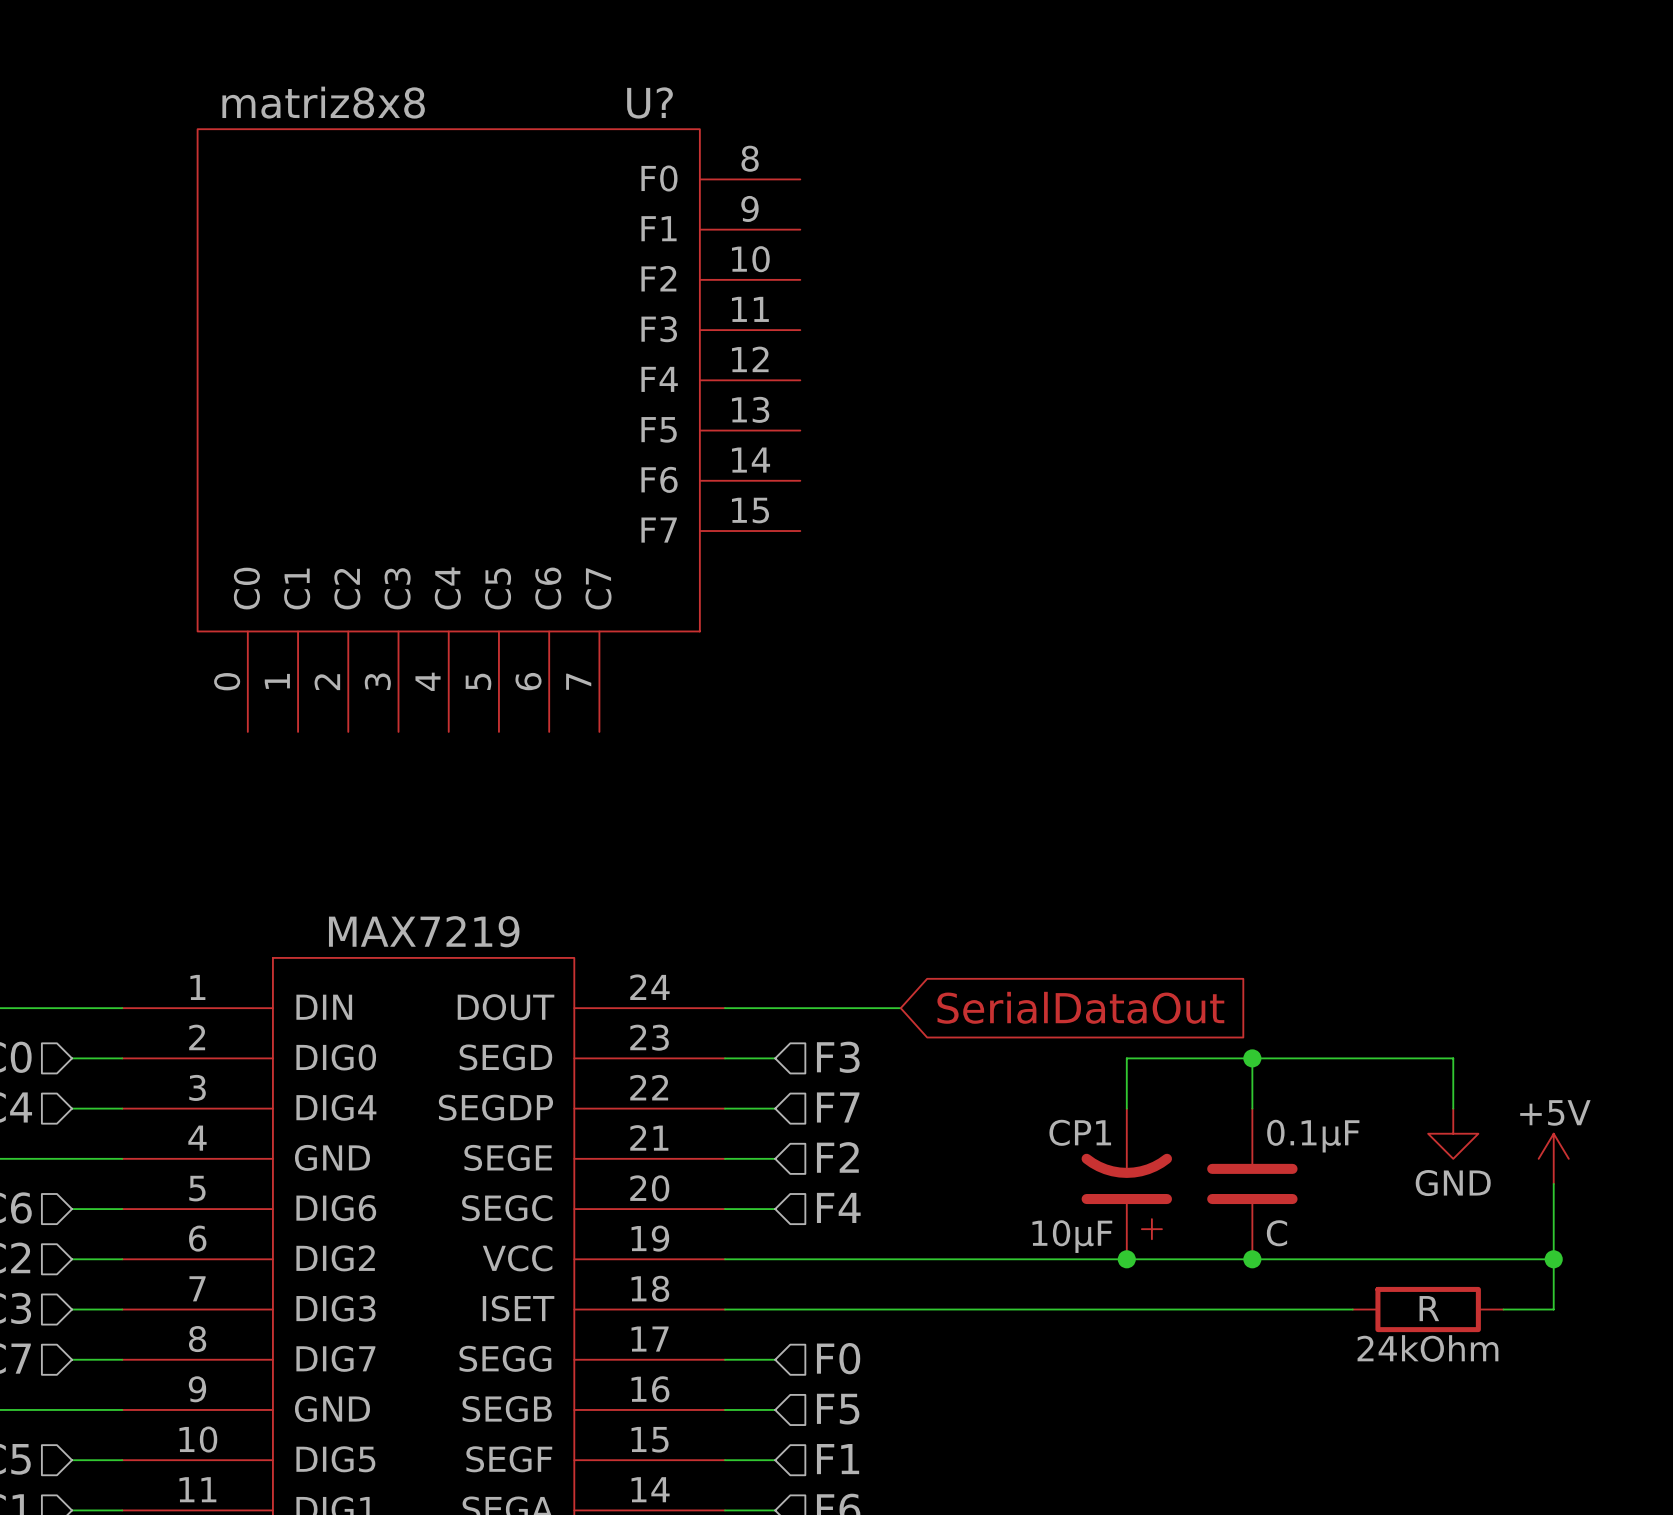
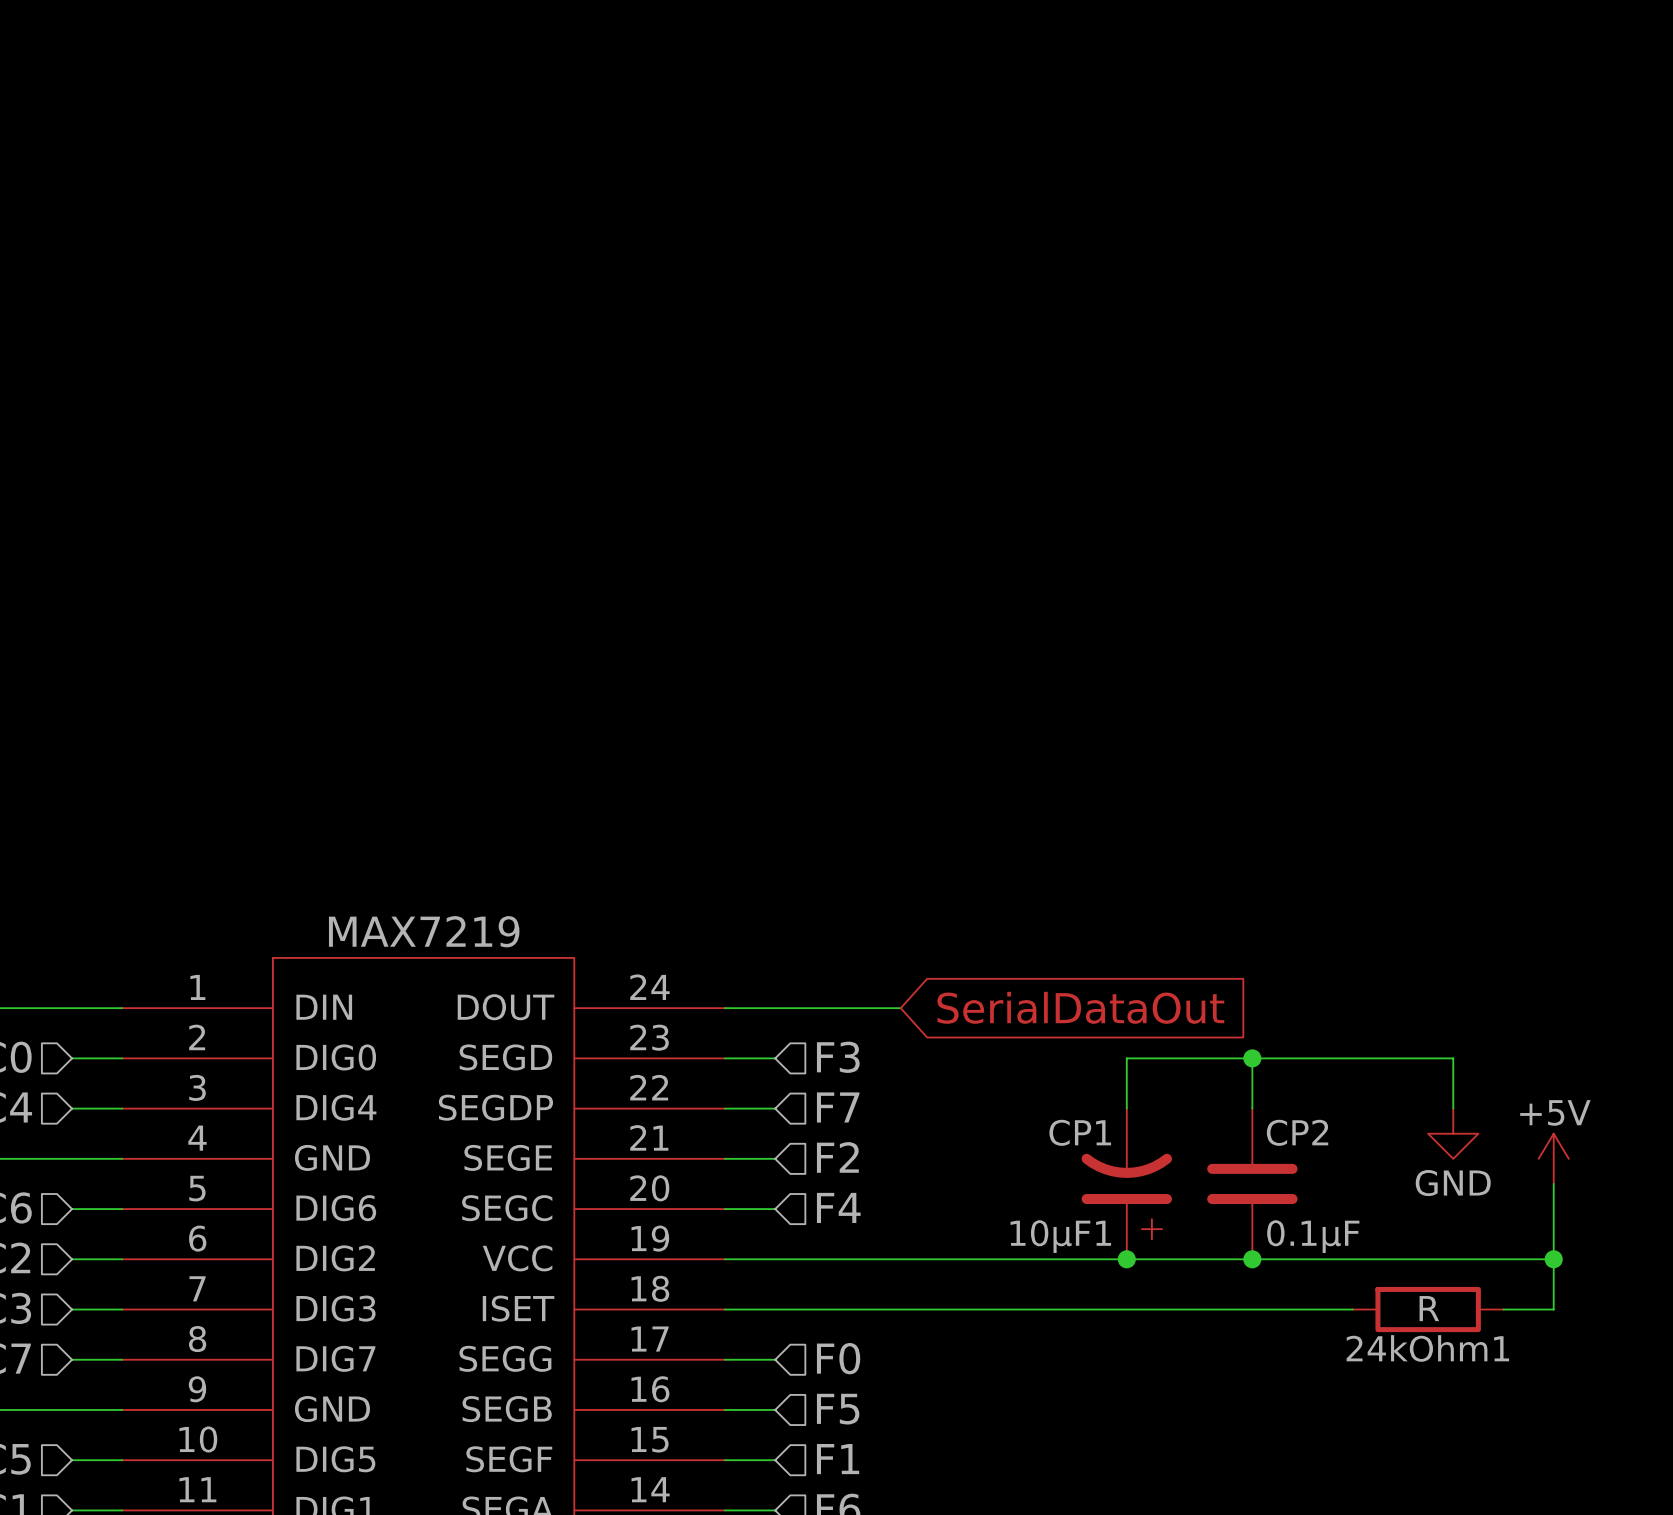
U?: matriz8x8 (498, 430) -> none
0.1µF name: 0.1µF (1313, 1136) -> CP2 (1297, 1132)
0.1µF value: C (1276, 1233) -> 0.1µF (1313, 1236)
10µF name: 10µF (1072, 1236) -> 10µF1 (1060, 1236)
24kOhm name: 24kOhm (1427, 1348) -> 24kOhm1 (1427, 1348)

